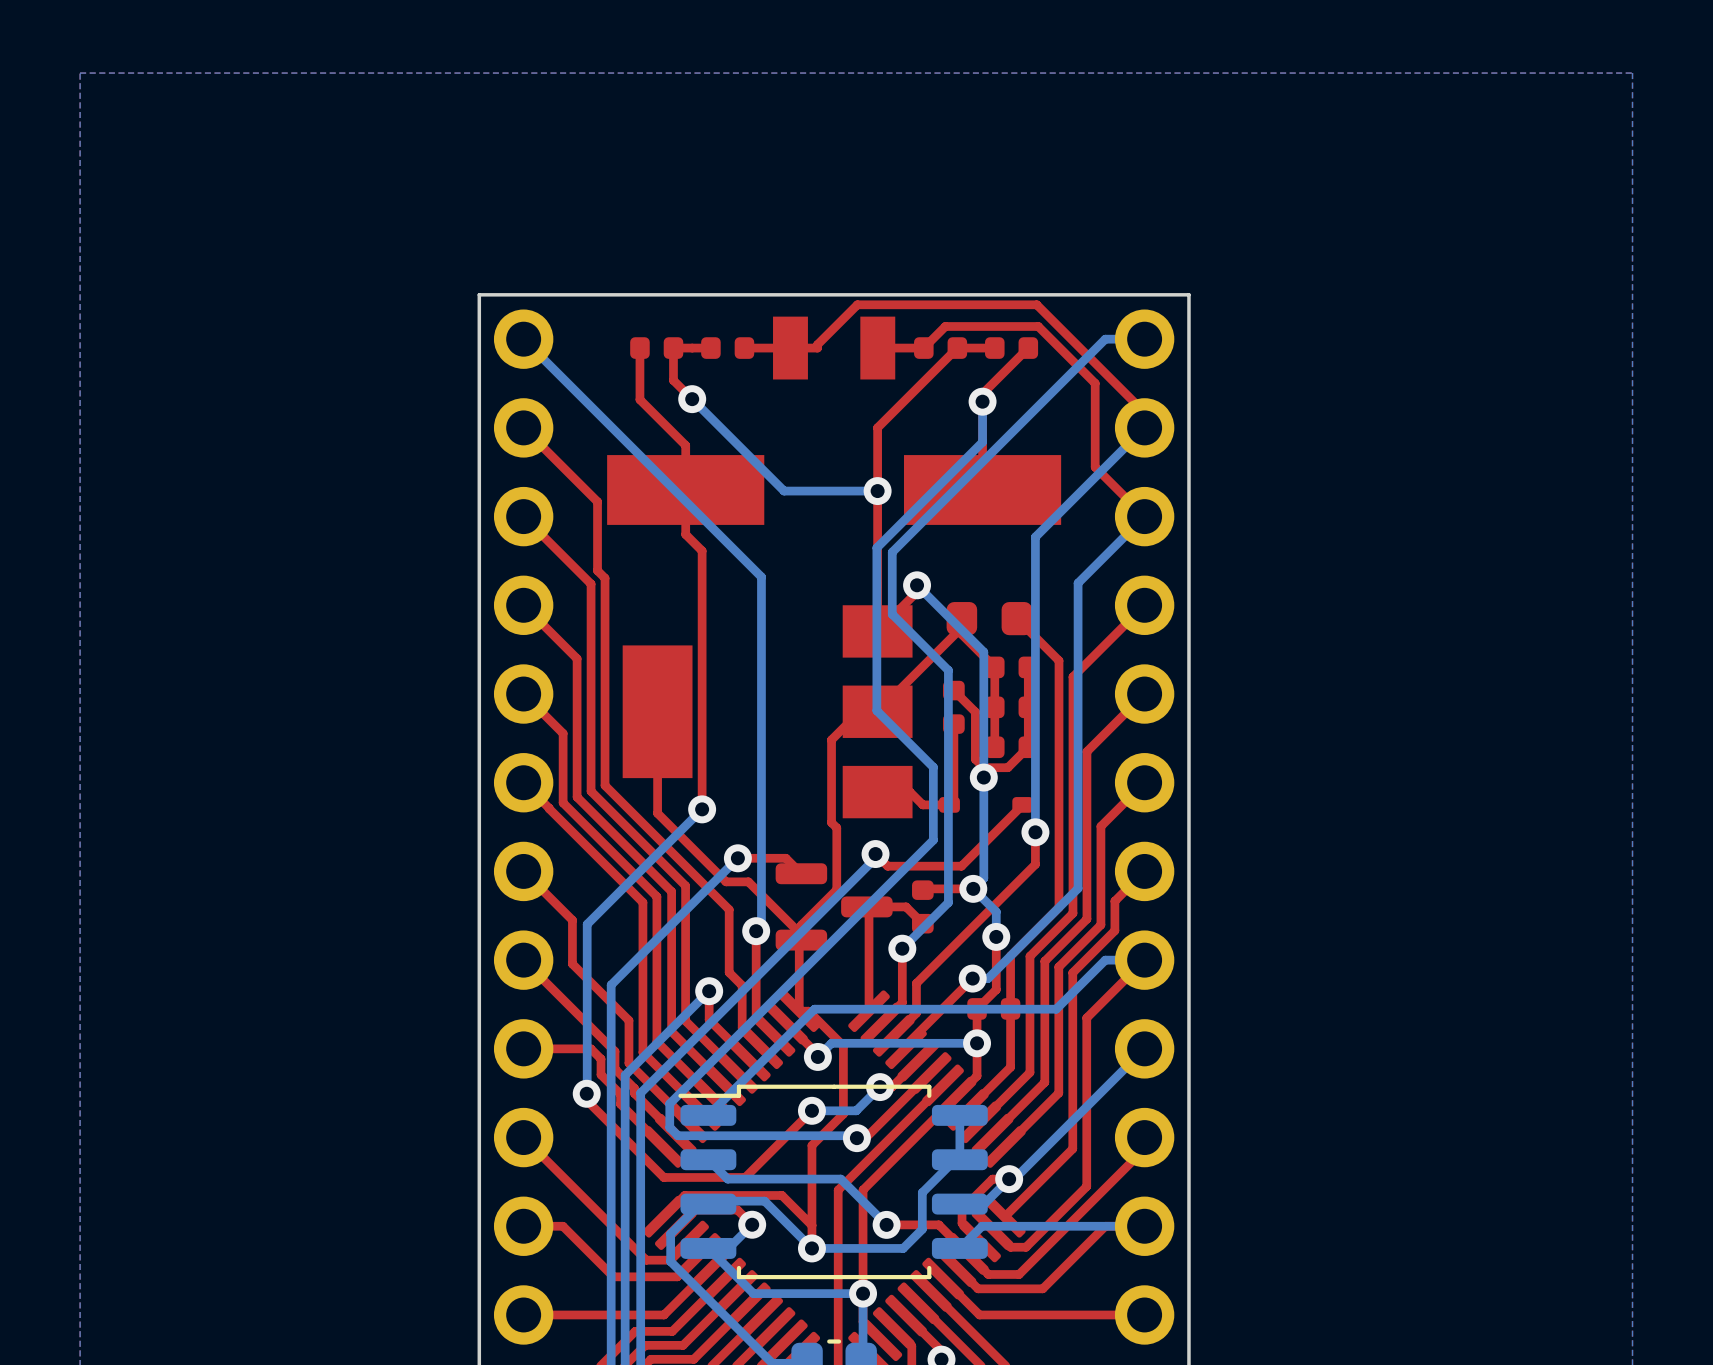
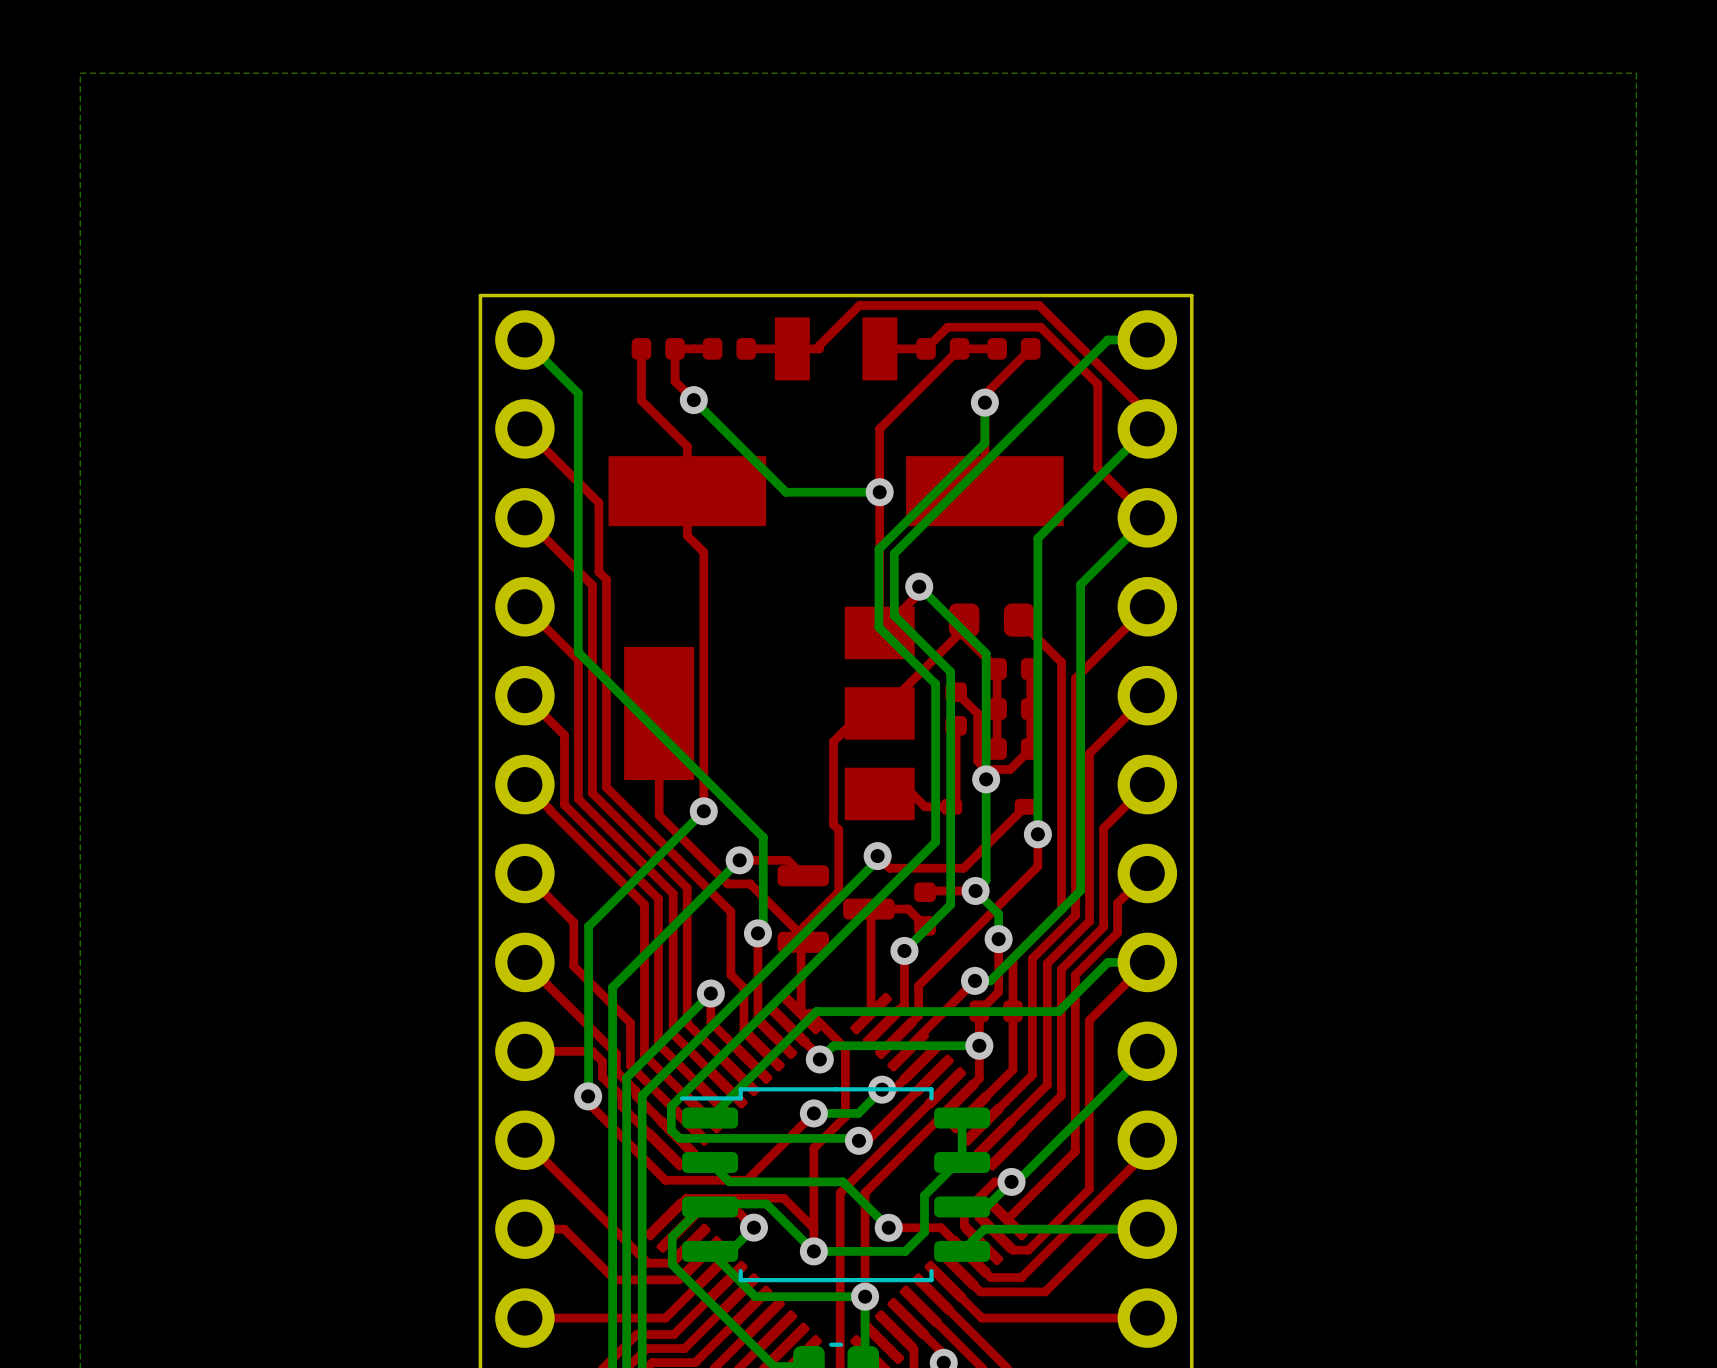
bottom track: (576, 392) (761, 576) (761, 835) -> (578, 393) (578, 652) (763, 837)
bottom track: (876, 625) (876, 710) (933, 767) -> (878, 627) (935, 683) (935, 769)

